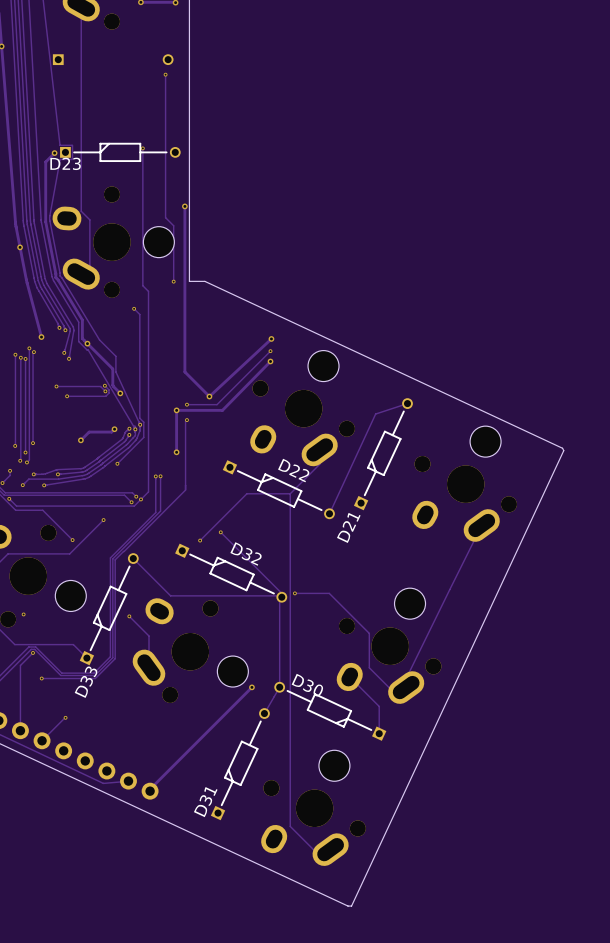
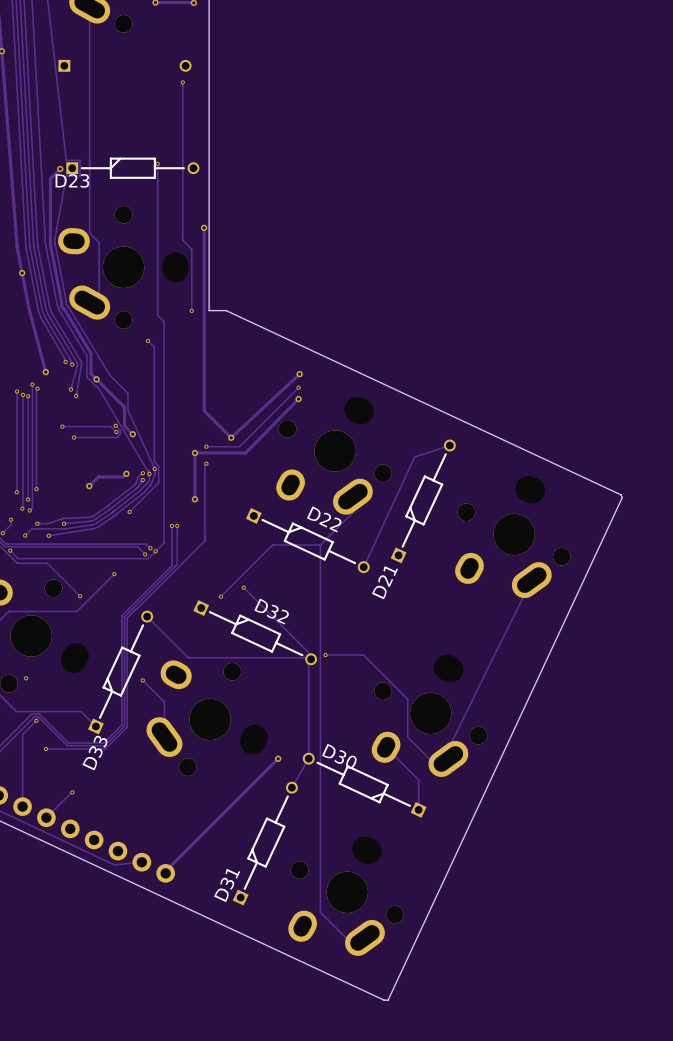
part footprint: [143, 226, 175, 258] -> [162, 252, 189, 283]
part footprint: [308, 350, 340, 382] -> [344, 396, 374, 425]
part footprint: [470, 426, 502, 458] -> [515, 475, 546, 504]
part footprint: [55, 580, 87, 612] -> [61, 643, 89, 673]
part footprint: [394, 588, 426, 620] -> [433, 654, 464, 683]
part footprint: [217, 656, 249, 688] -> [240, 724, 268, 755]
part footprint: [318, 750, 350, 782] -> [352, 836, 382, 865]

